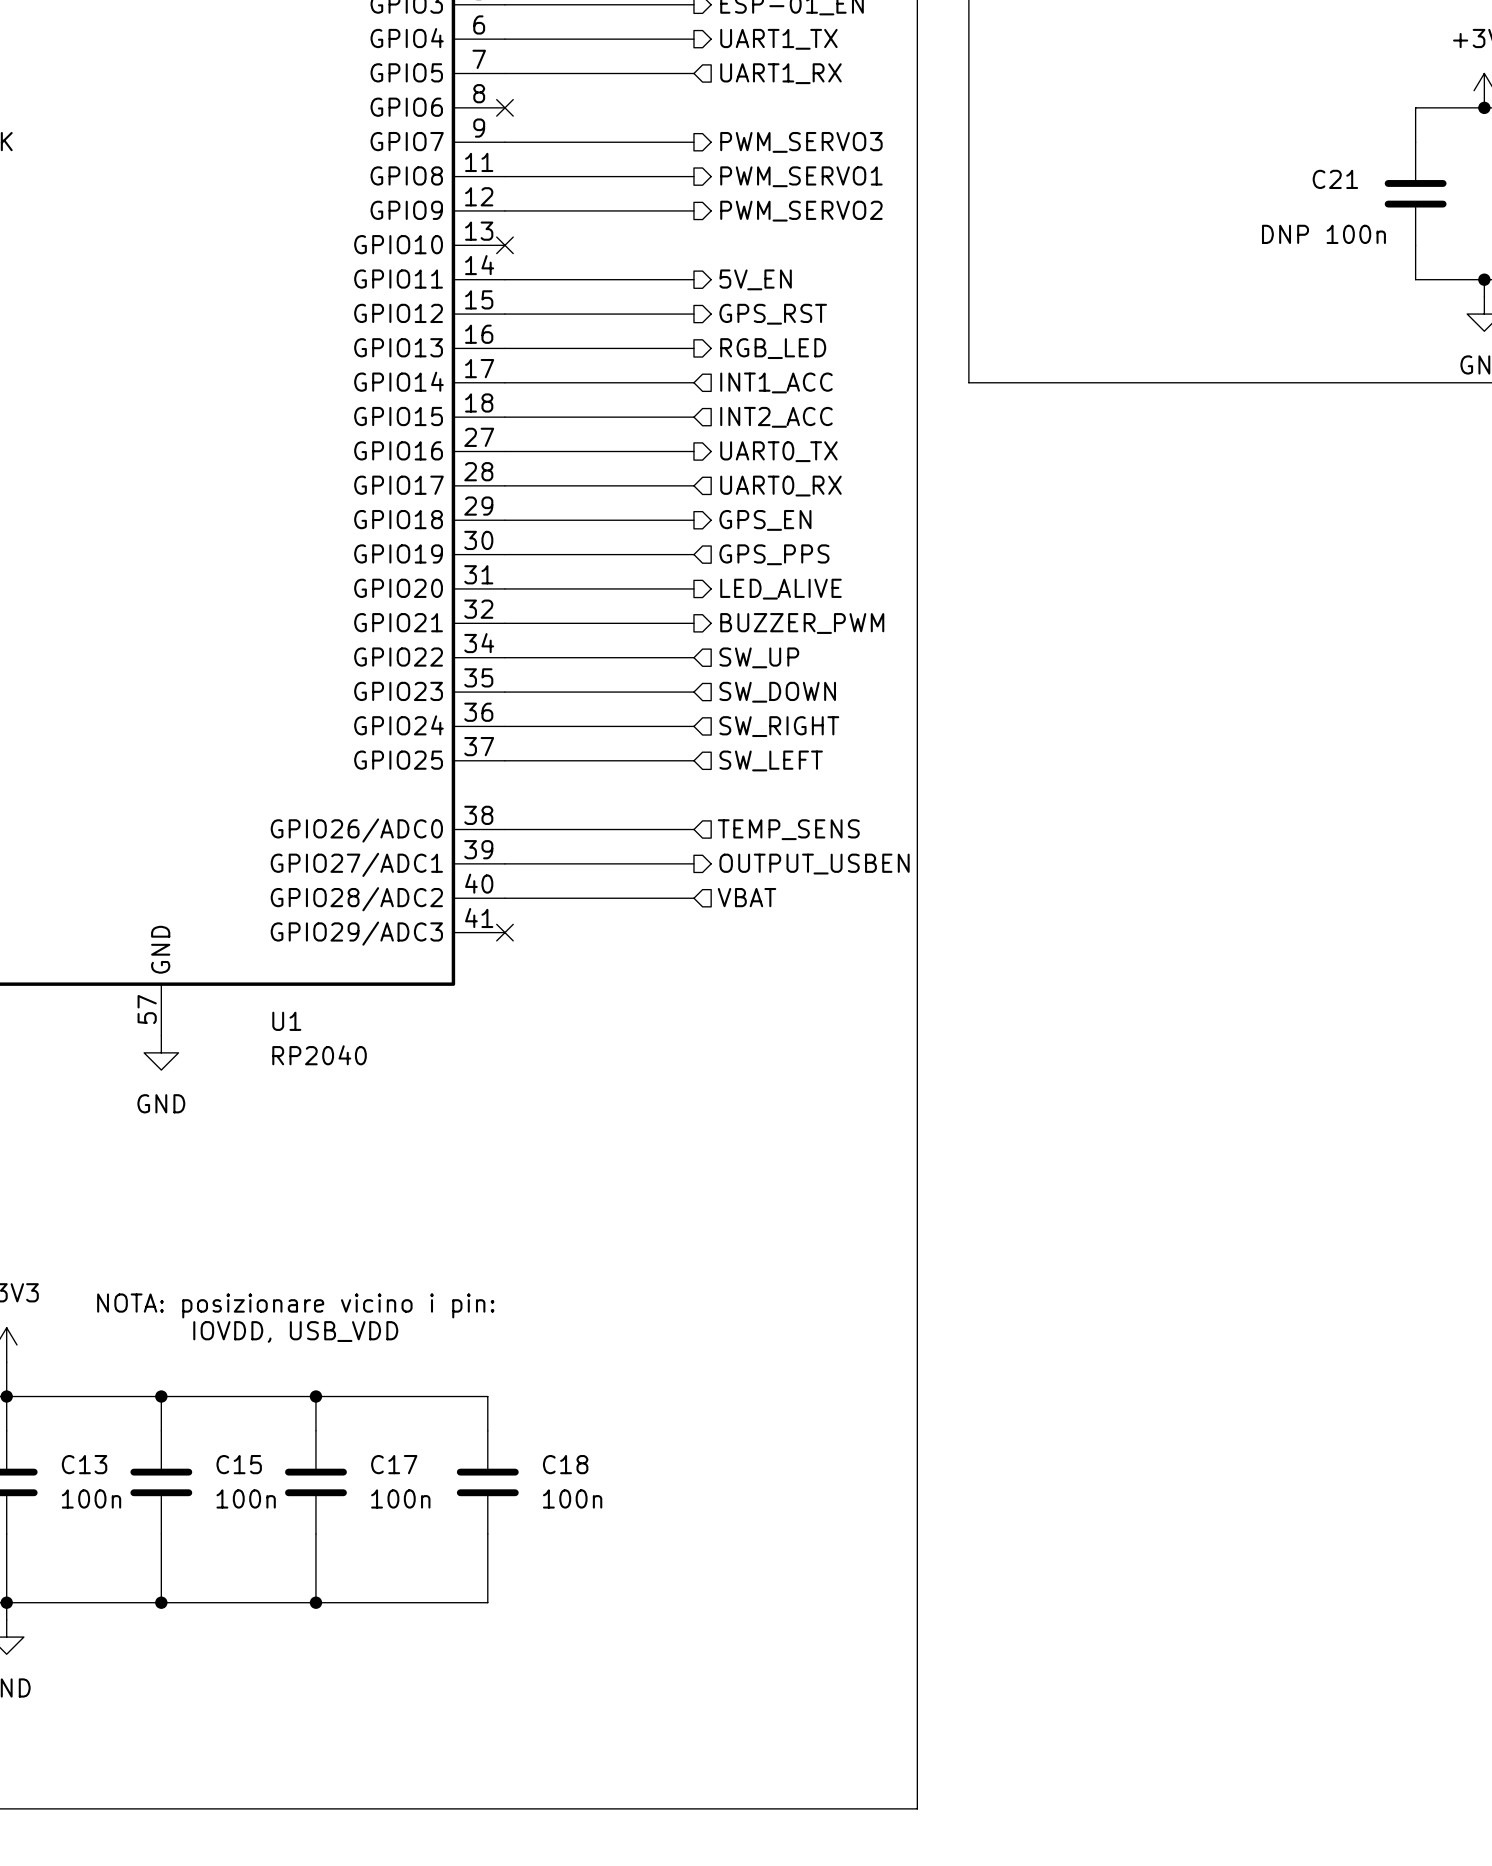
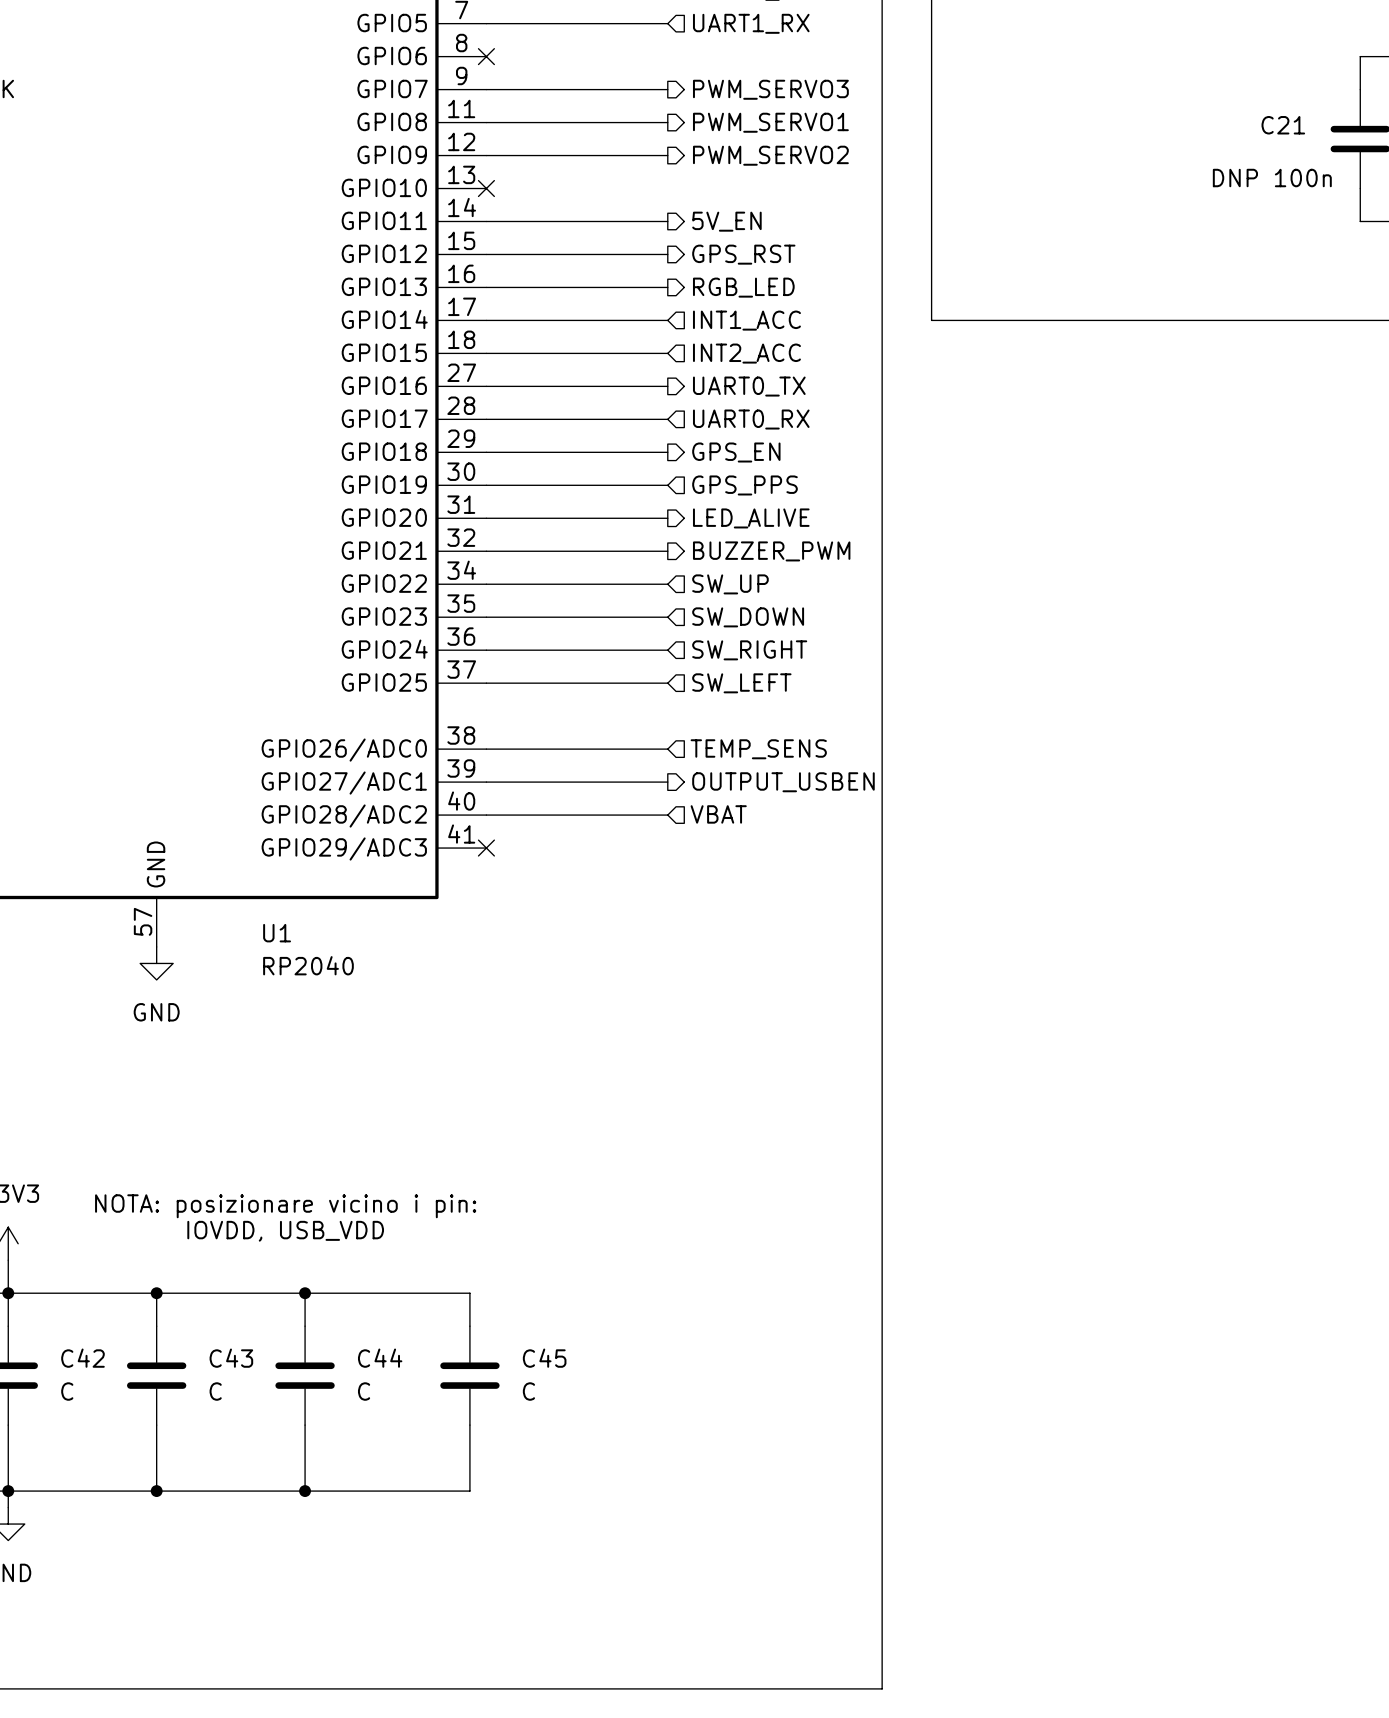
C13 name: C13 (84, 1464) -> C42 (82, 1358)
C15 name: C15 (239, 1464) -> C43 (231, 1358)
C17 name: C17 (394, 1464) -> C44 (380, 1358)
C18 name: C18 (565, 1464) -> C45 (544, 1358)
C13 value: 100n (91, 1498) -> C (67, 1391)
C15 value: 100n (246, 1498) -> C (215, 1391)
C17 value: 100n (400, 1498) -> C (364, 1391)
C18 value: 100n (572, 1498) -> C (528, 1391)

